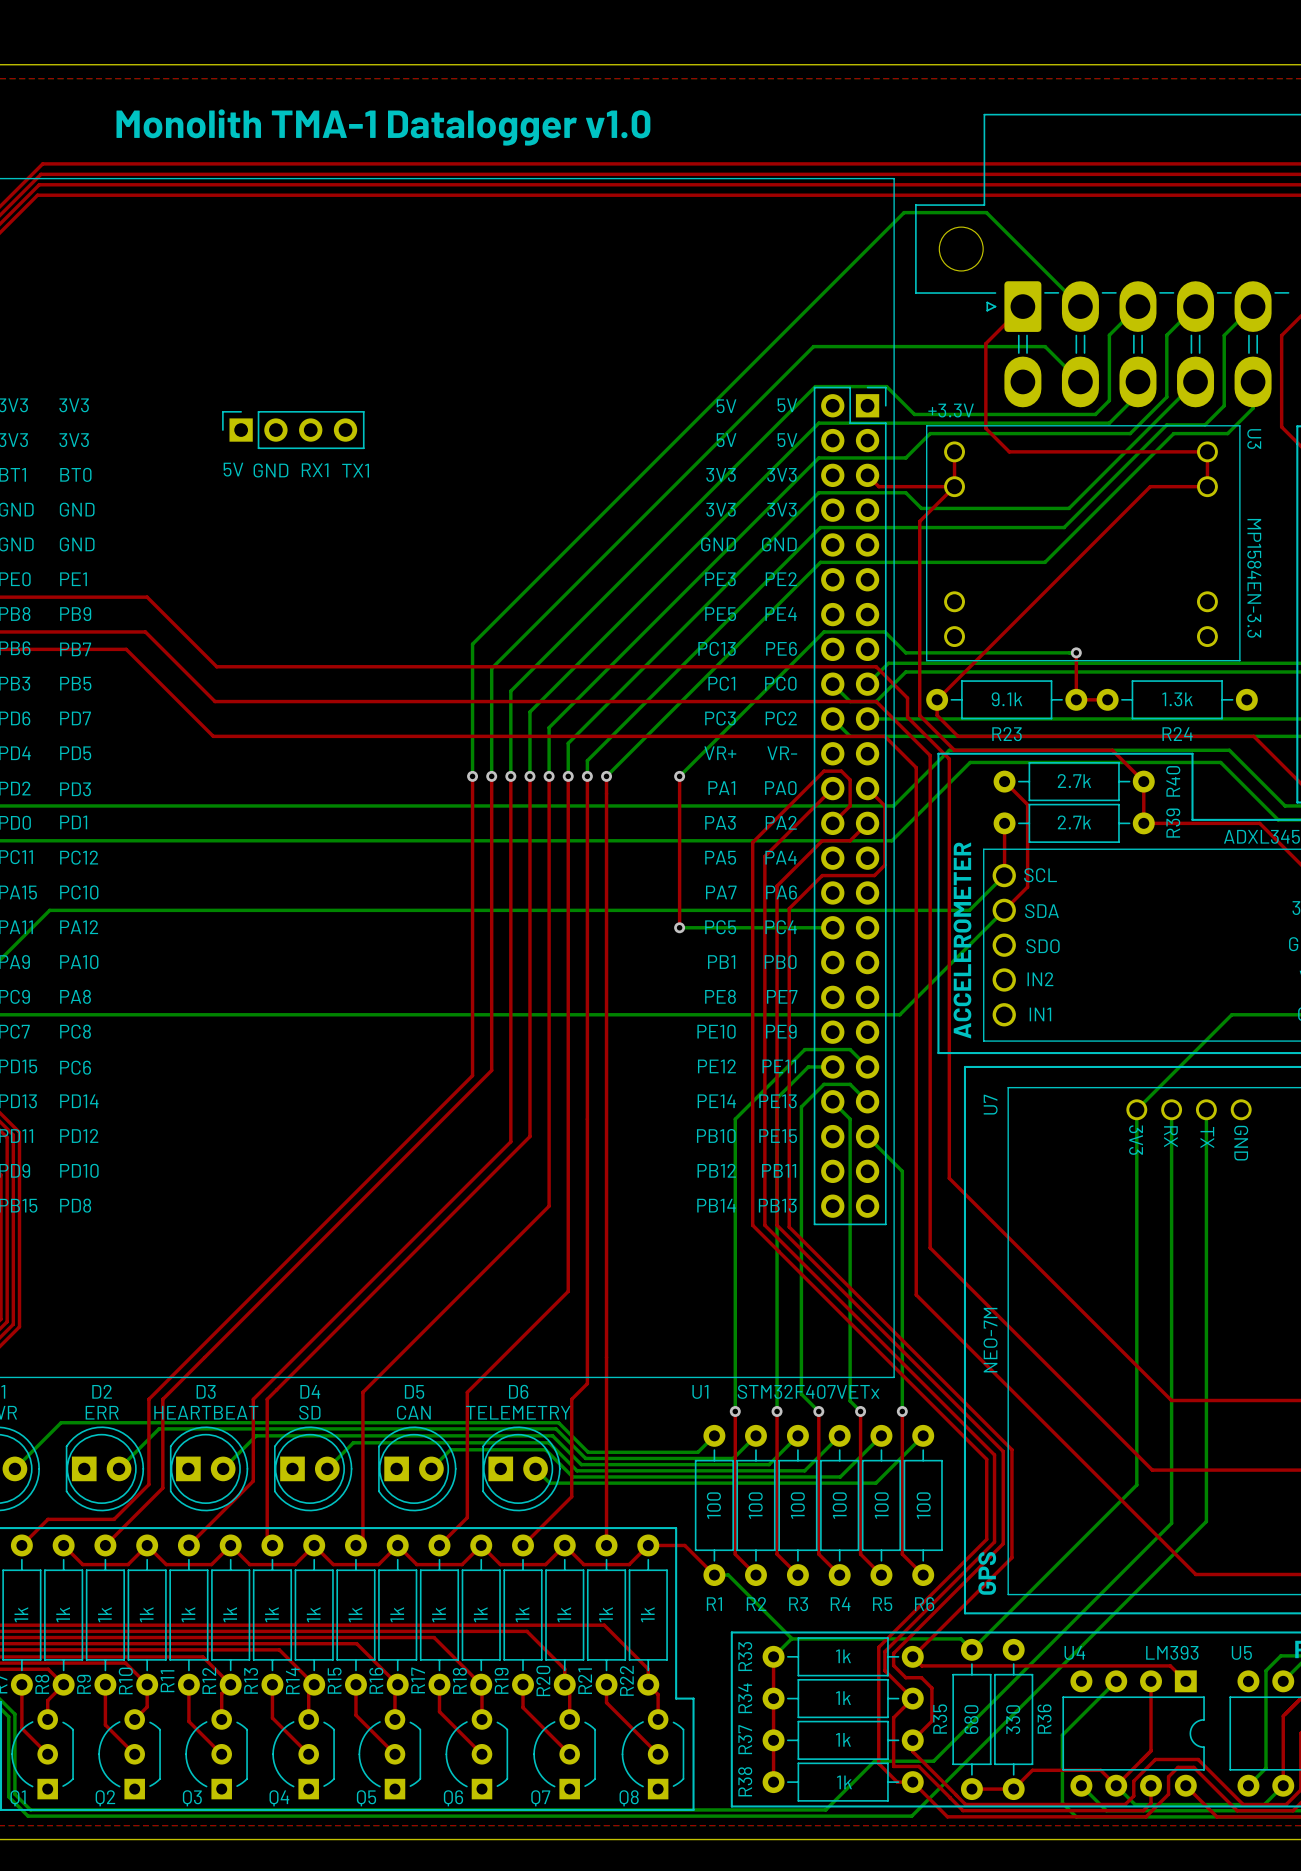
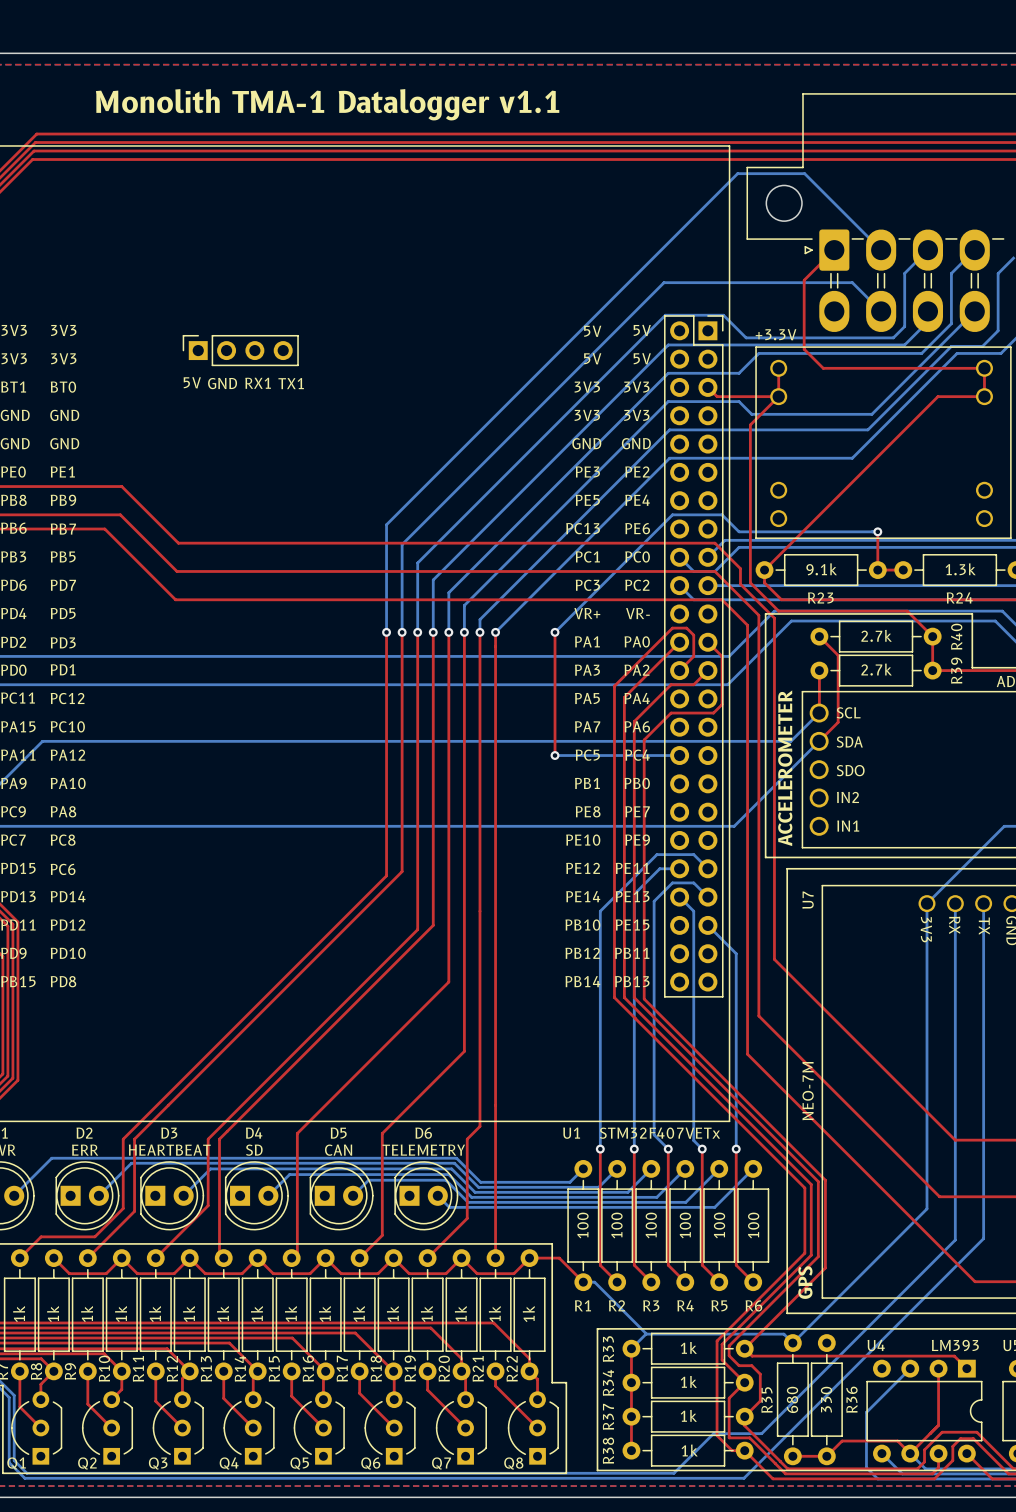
text: Monolith TMA-1 Datalogger v1.0 (383, 127) -> Monolith TMA-1 Datalogger v1.1 (327, 104)

